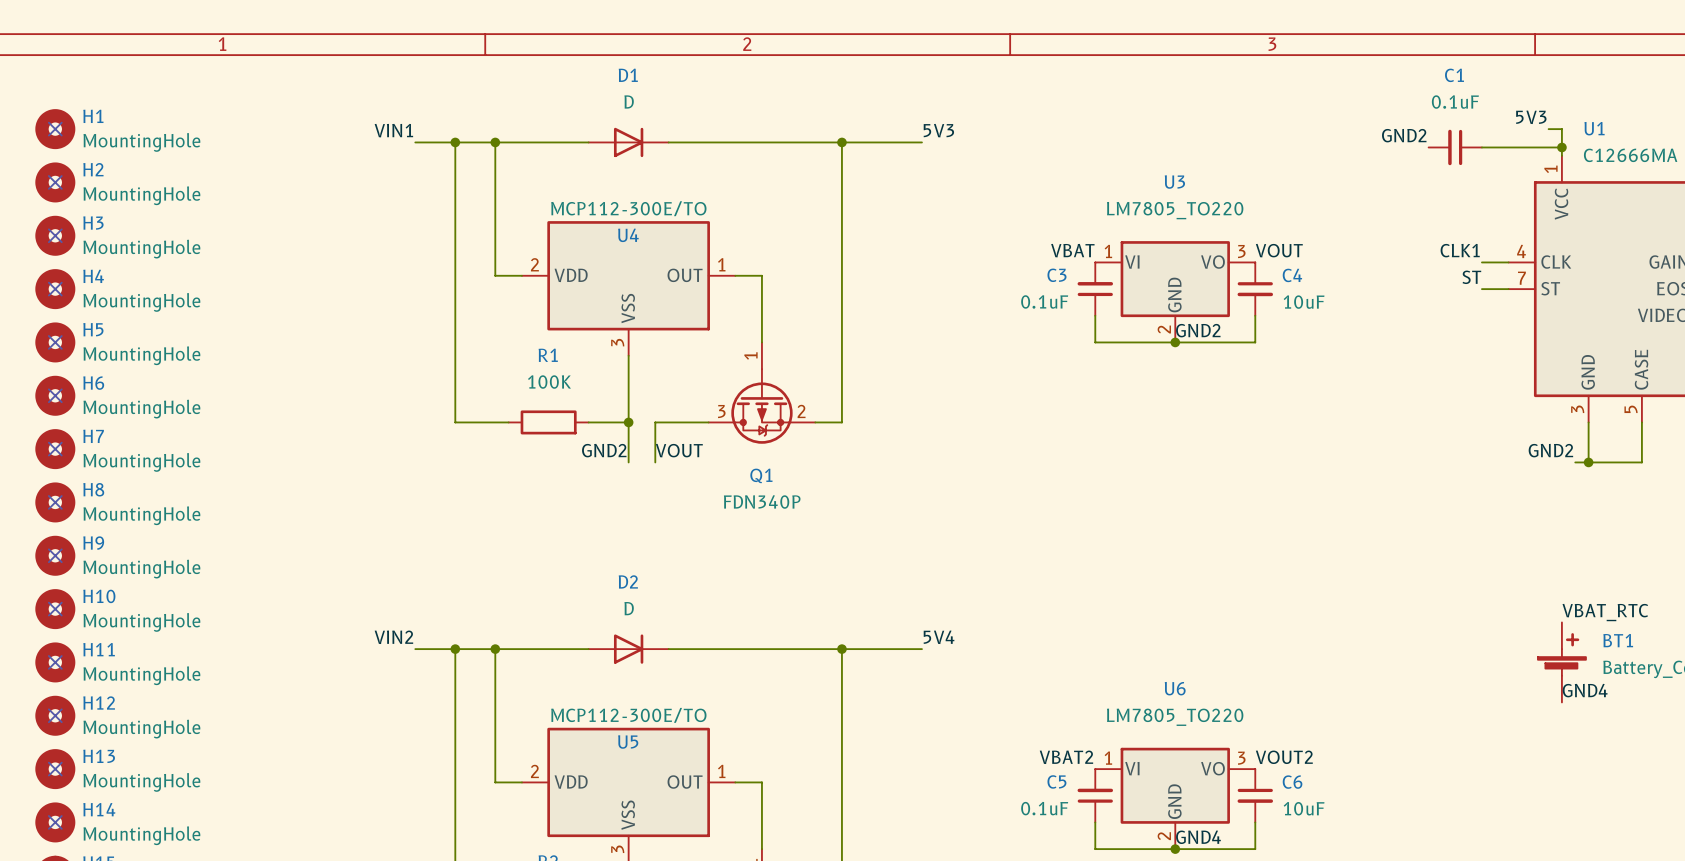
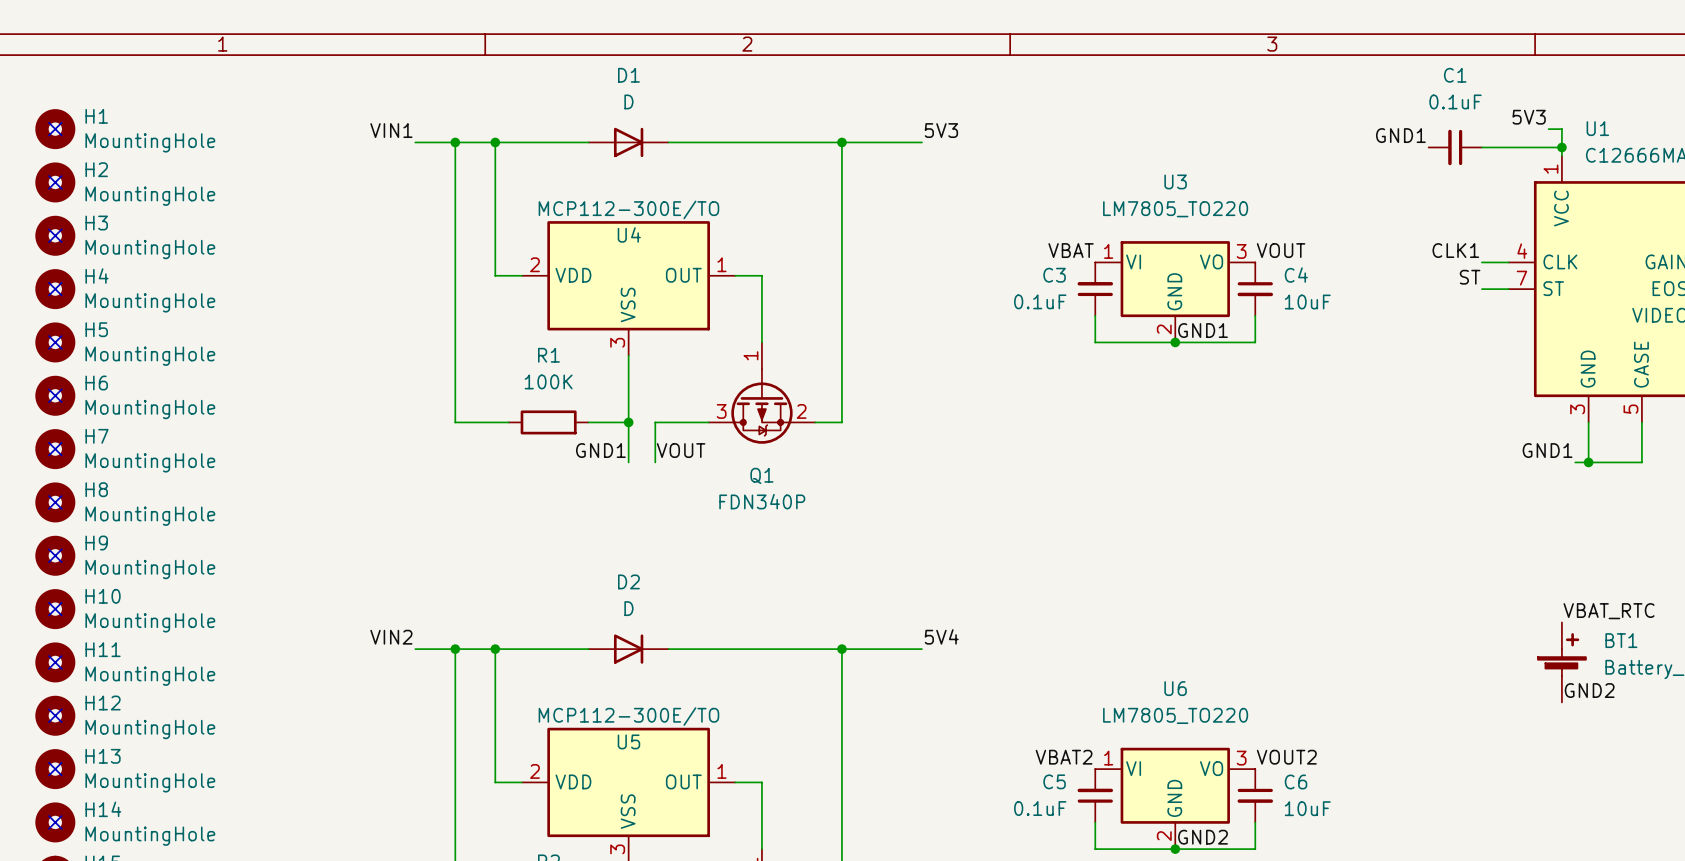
label: GND2 (1404, 135) -> GND1 (1400, 135)
label: GND2 (1198, 330) -> GND1 (1203, 330)
label: GND2 (604, 450) -> GND1 (600, 450)
label: GND2 (1550, 450) -> GND1 (1547, 450)
label: GND4 (1585, 690) -> GND2 (1589, 690)
label: GND4 (1198, 837) -> GND2 (1203, 837)

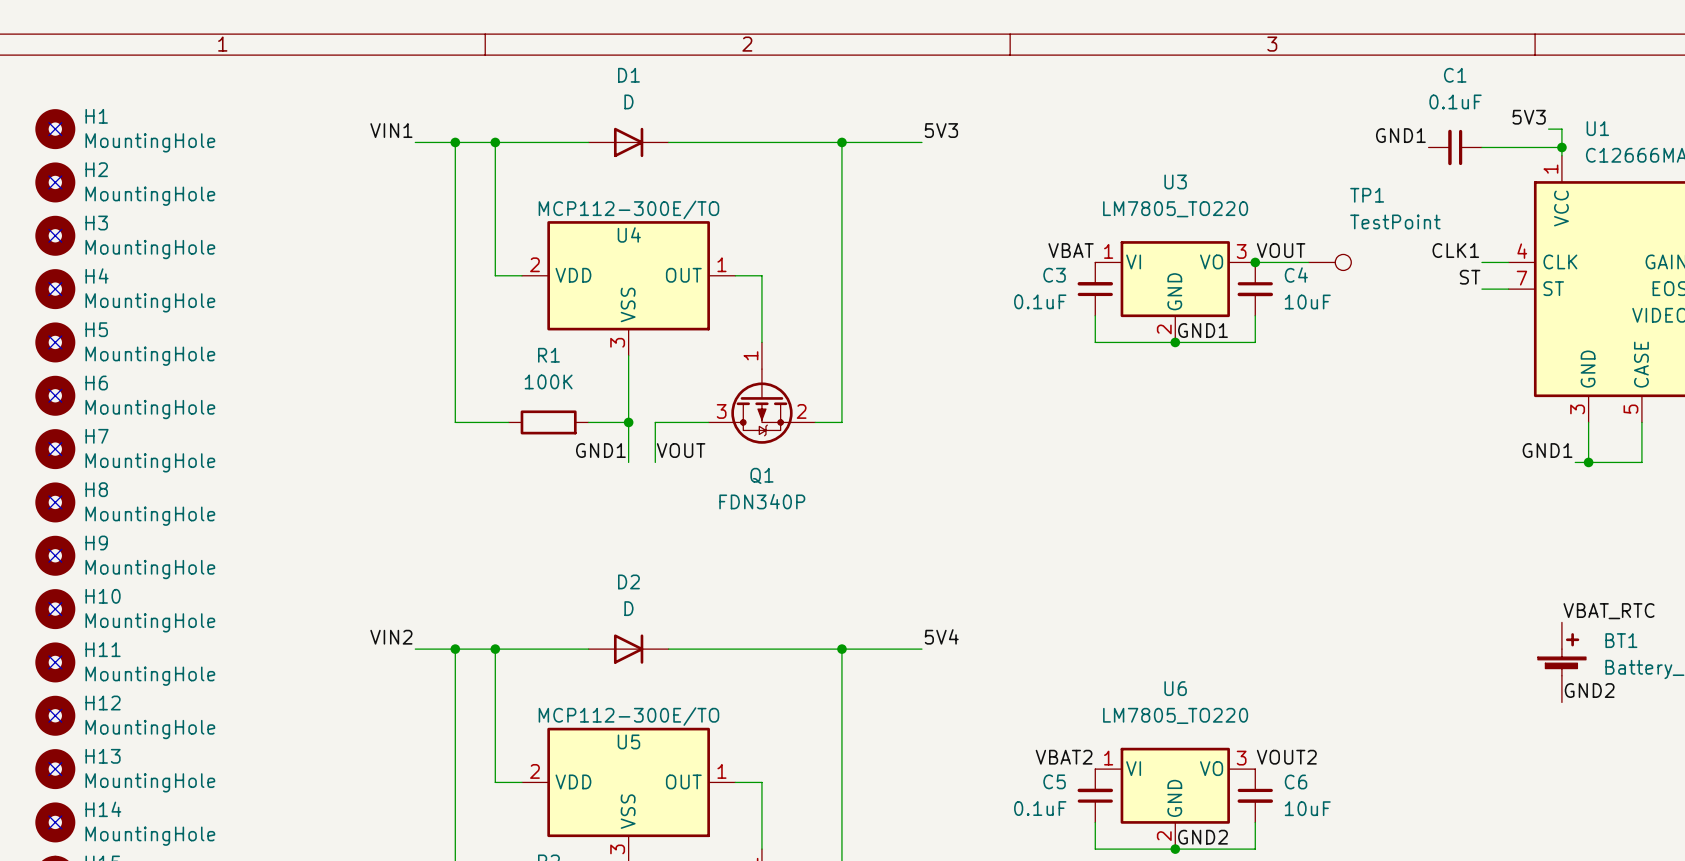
wire: none -> (1255, 262) (1308, 262)
junction: none -> (1255, 262)
TP1: none -> TestPoint (1329, 262)

